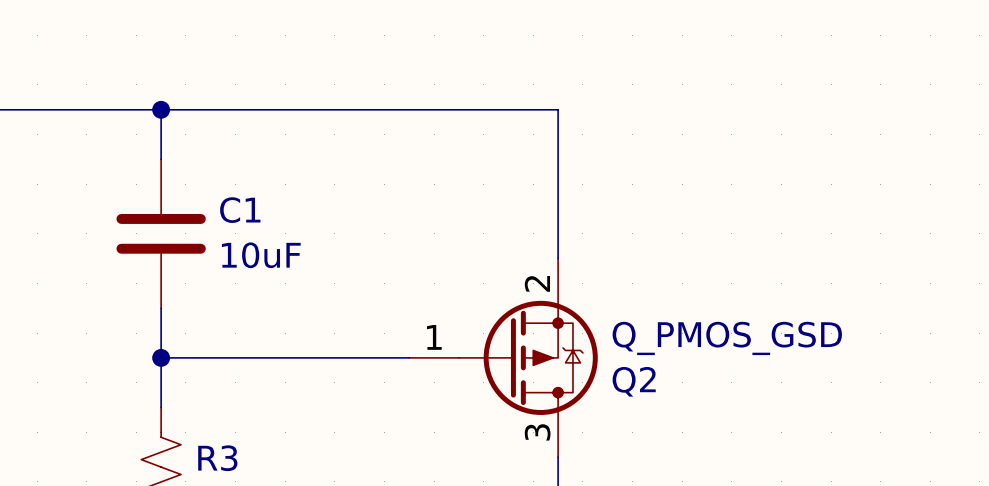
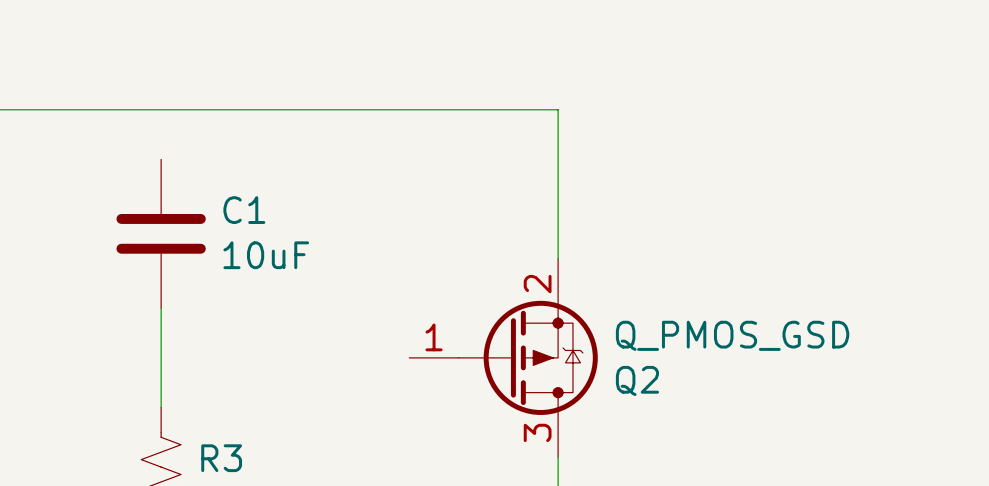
wire: (161, 109) (161, 159) -> none
junction: (161, 109) -> none
wire: (161, 357) (409, 357) -> none
junction: (161, 357) -> none

